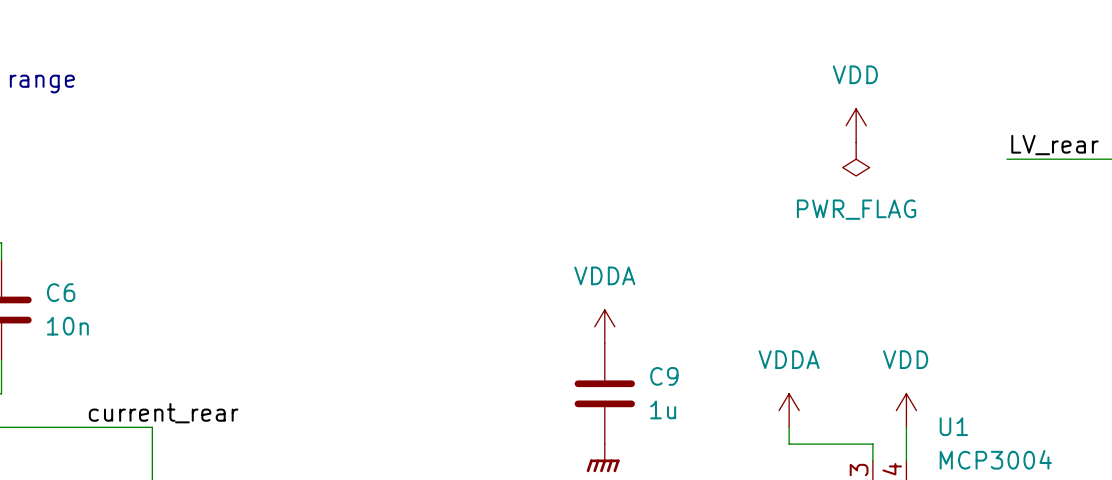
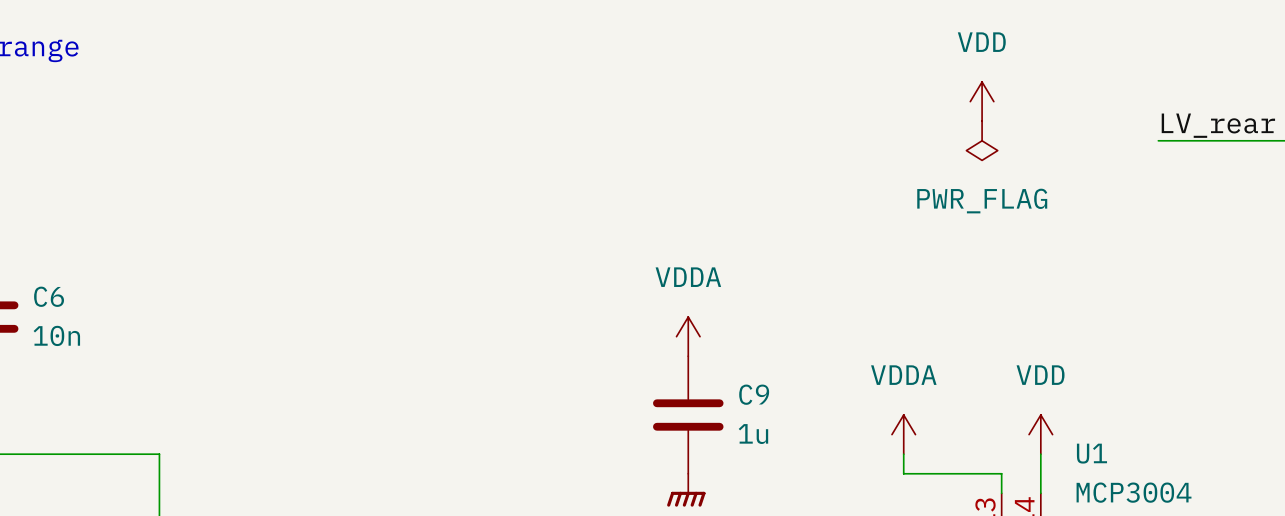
label: current_rear (163, 413) -> none

